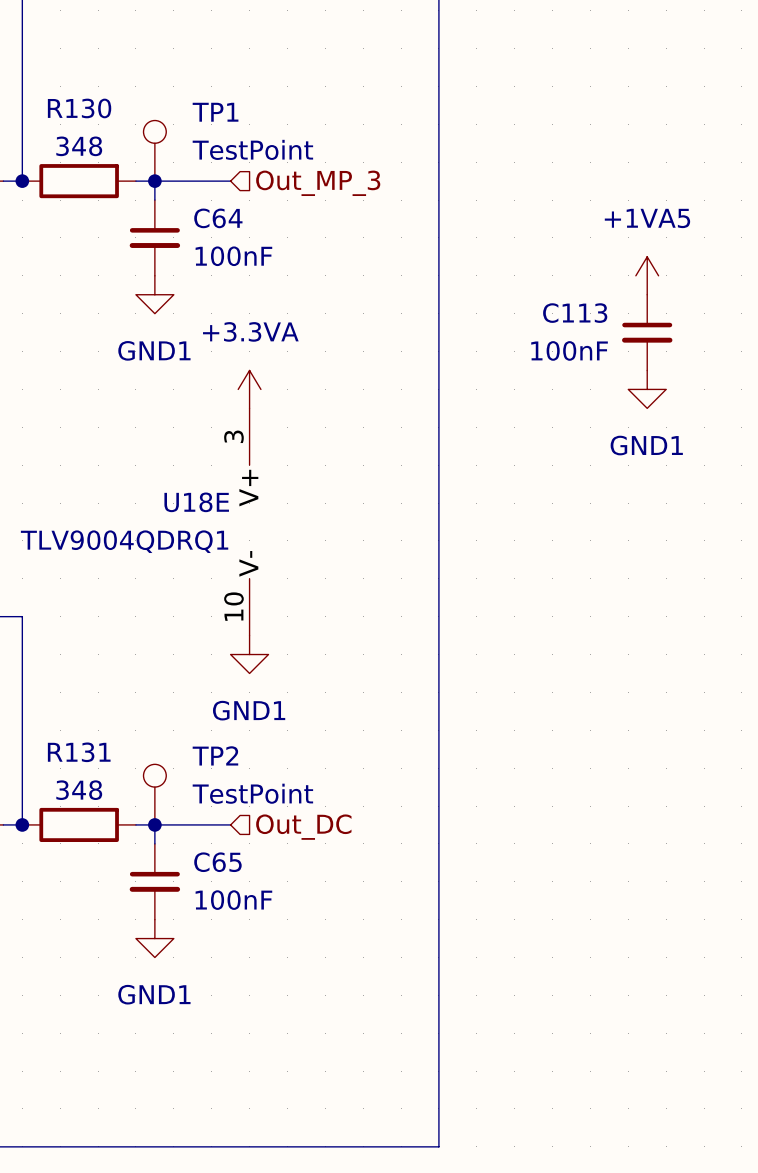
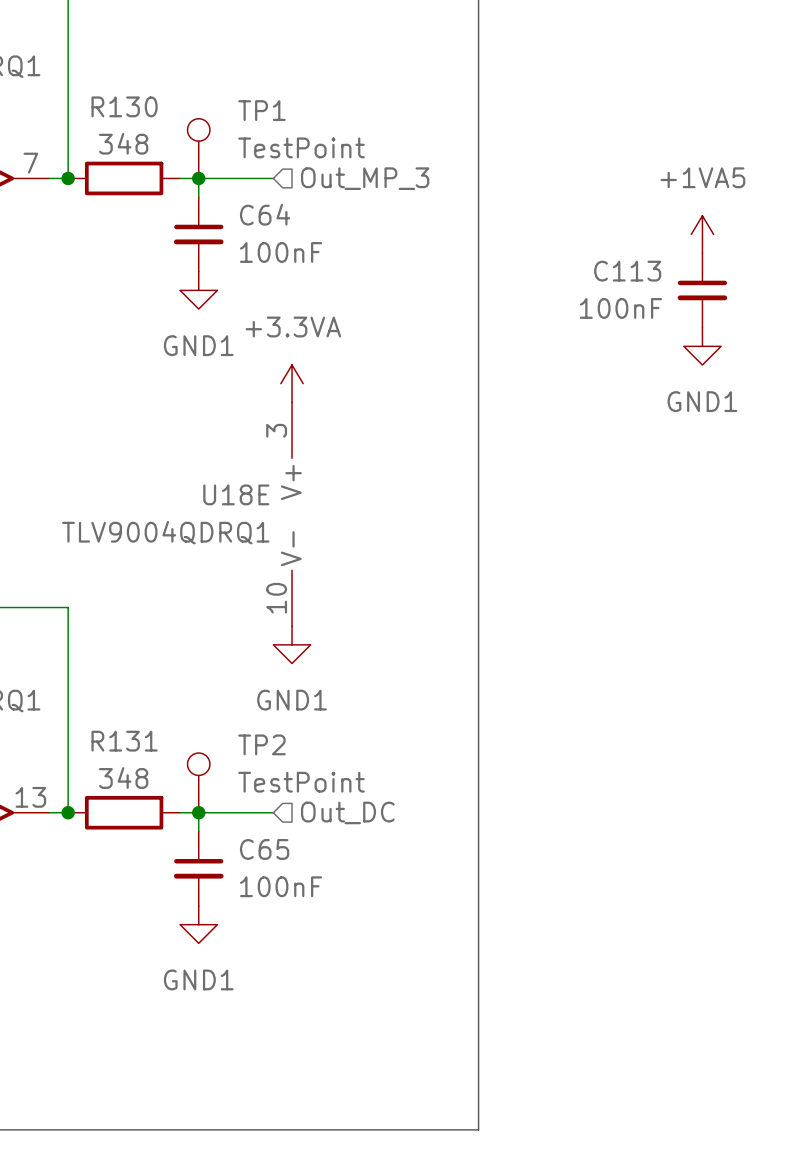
power symbol position: +1VA5 (647, 275) -> +1VA5 (702, 234)
C113 position: (647, 332) -> (702, 290)
power symbol position: GND1 (647, 389) -> GND1 (702, 346)

